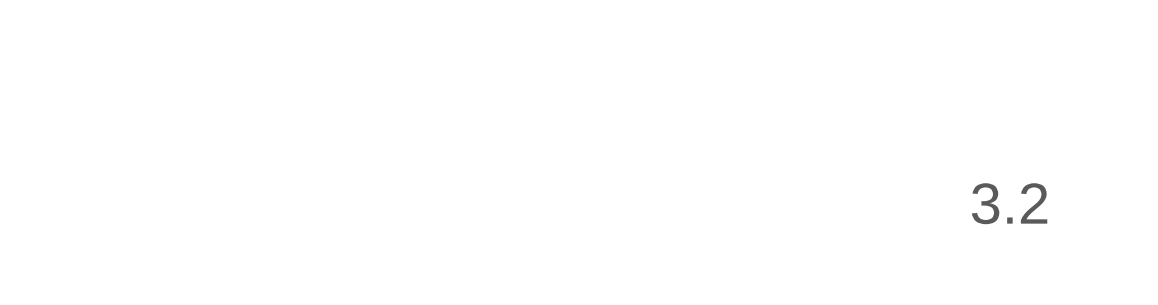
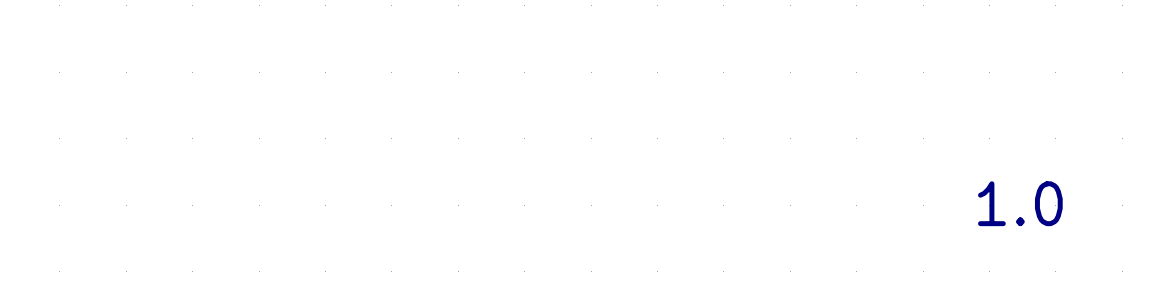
text: 3.2 (1009, 203) -> 1.0 (1020, 203)

